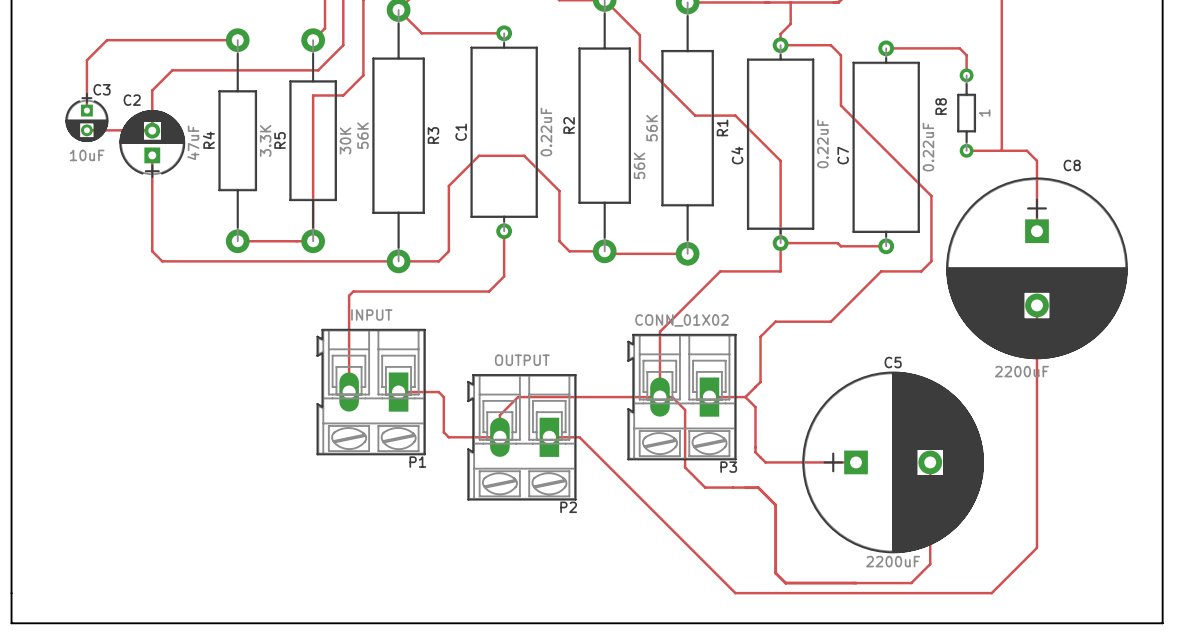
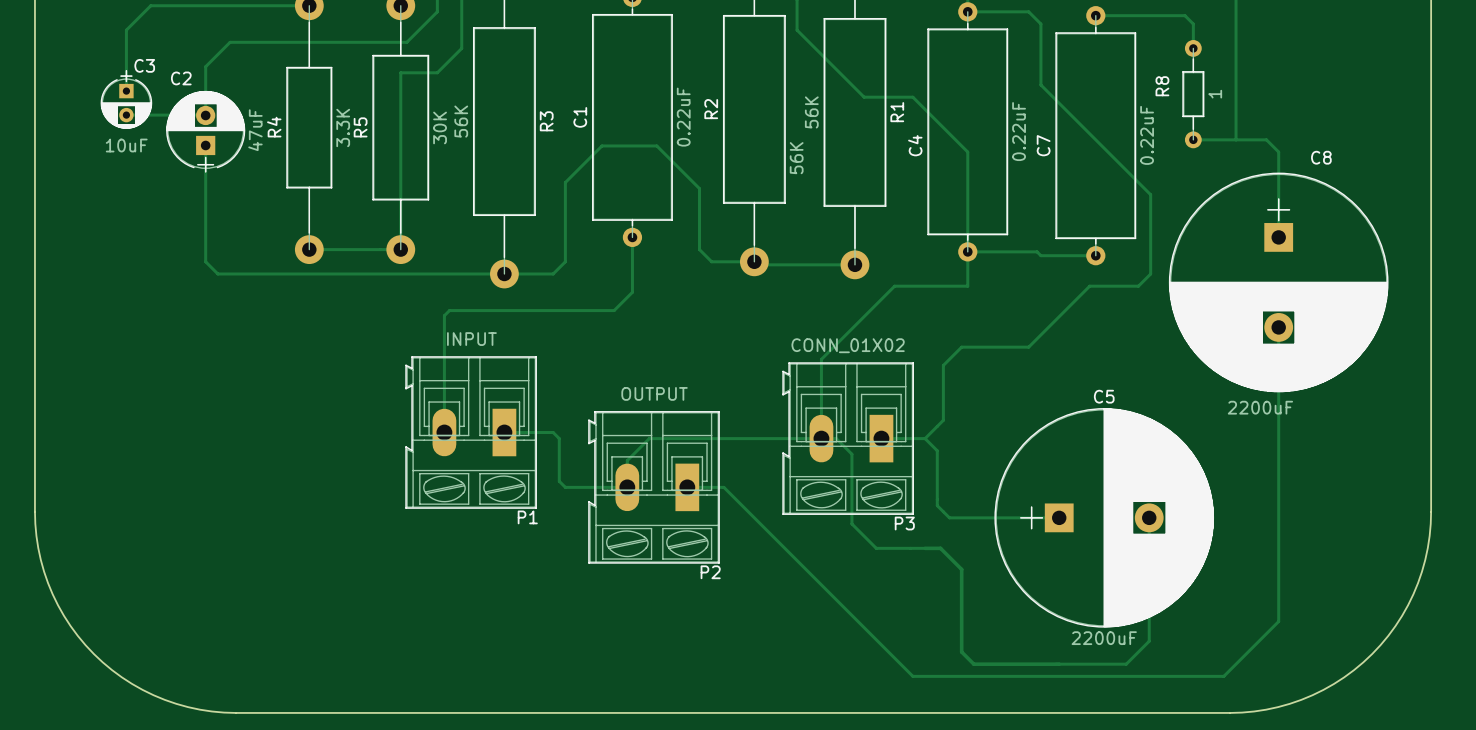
board edge: (11, 457) (11, 623) (177, 623) -> (34, 511) (40, 559) (52, 594) (70, 626) (93, 654) (121, 677) (153, 695) (188, 707) (236, 712)
board edge: (1162, 457) (1162, 623) (996, 623) -> (1431, 511) (1425, 559) (1413, 594) (1395, 626) (1372, 654) (1344, 677) (1312, 695) (1266, 709) (1229, 712)

